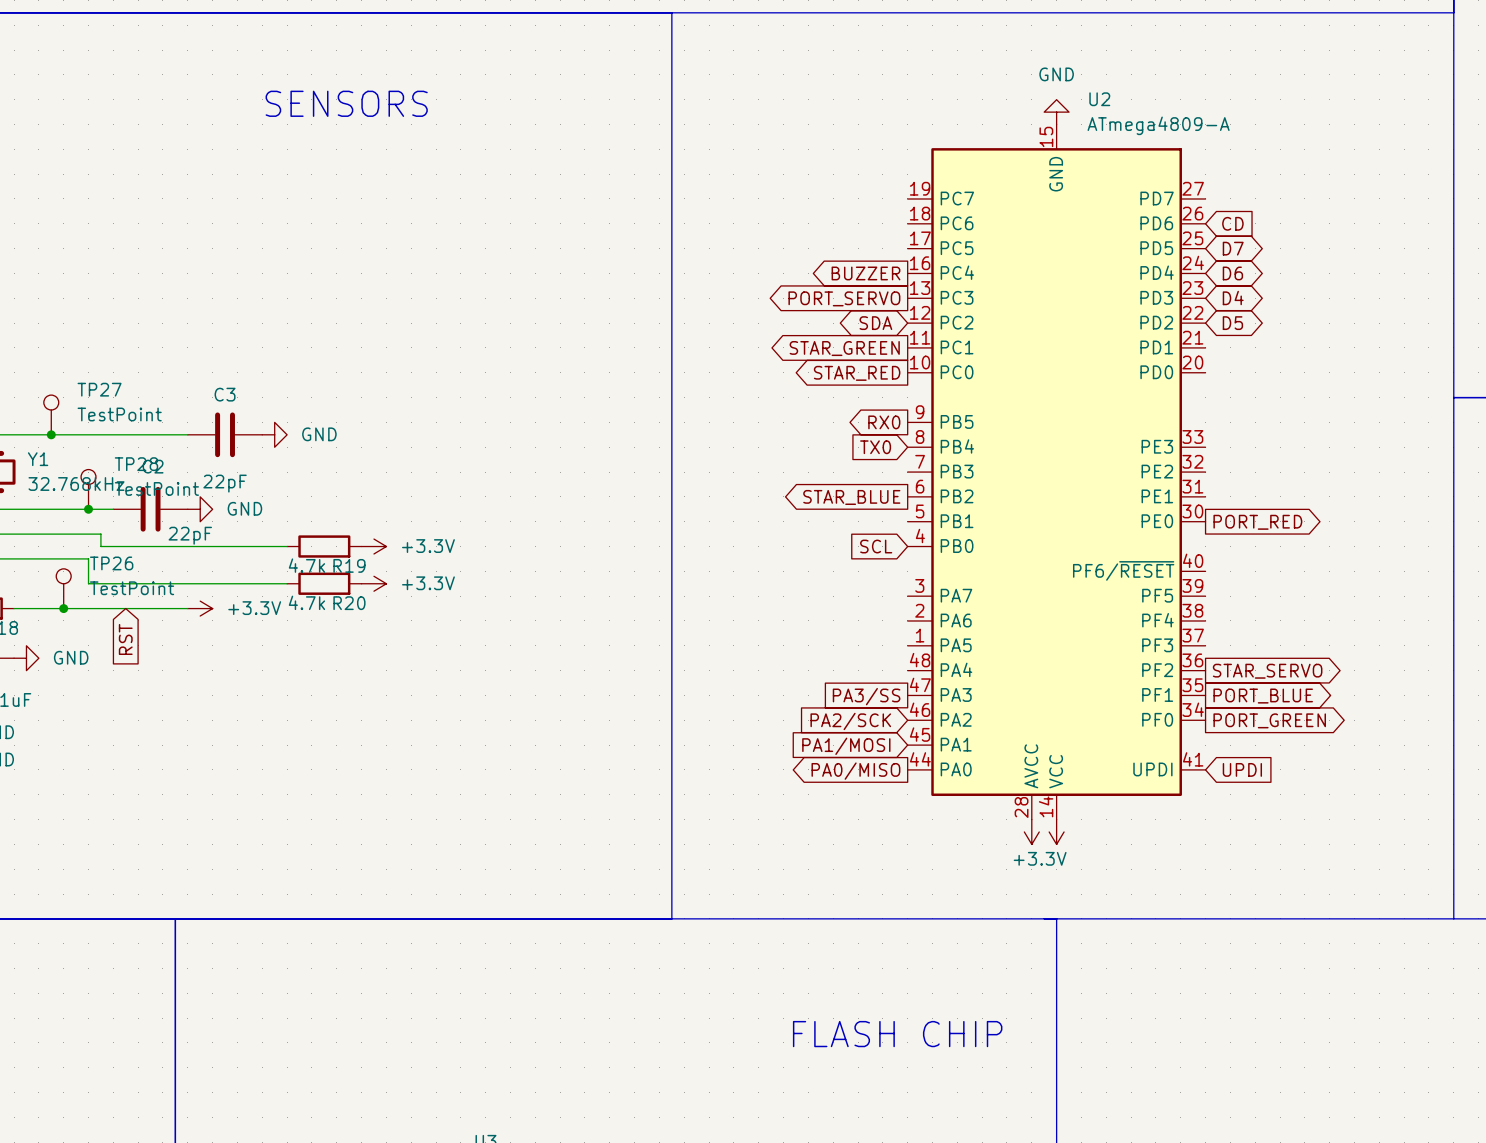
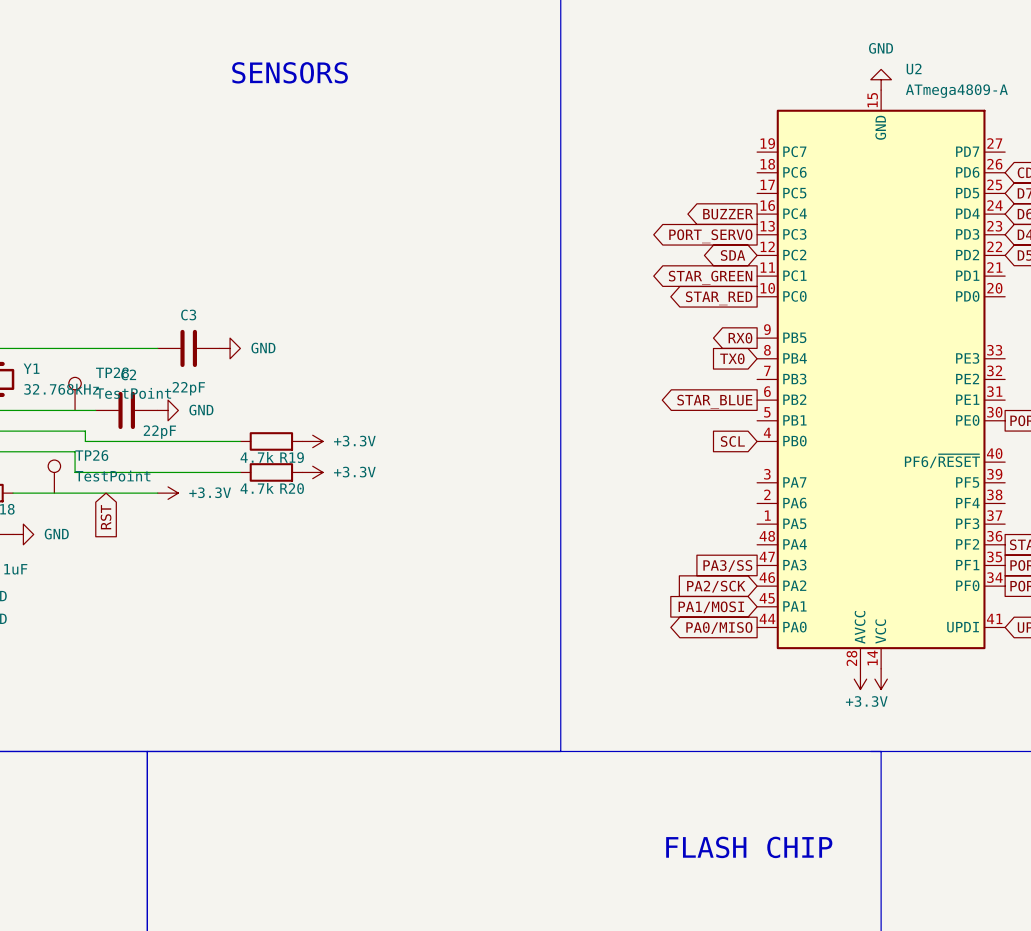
TP27: TestPoint (51, 414) -> none
junction: (51, 434) -> none
junction: (88, 509) -> none
junction: (63, 608) -> none

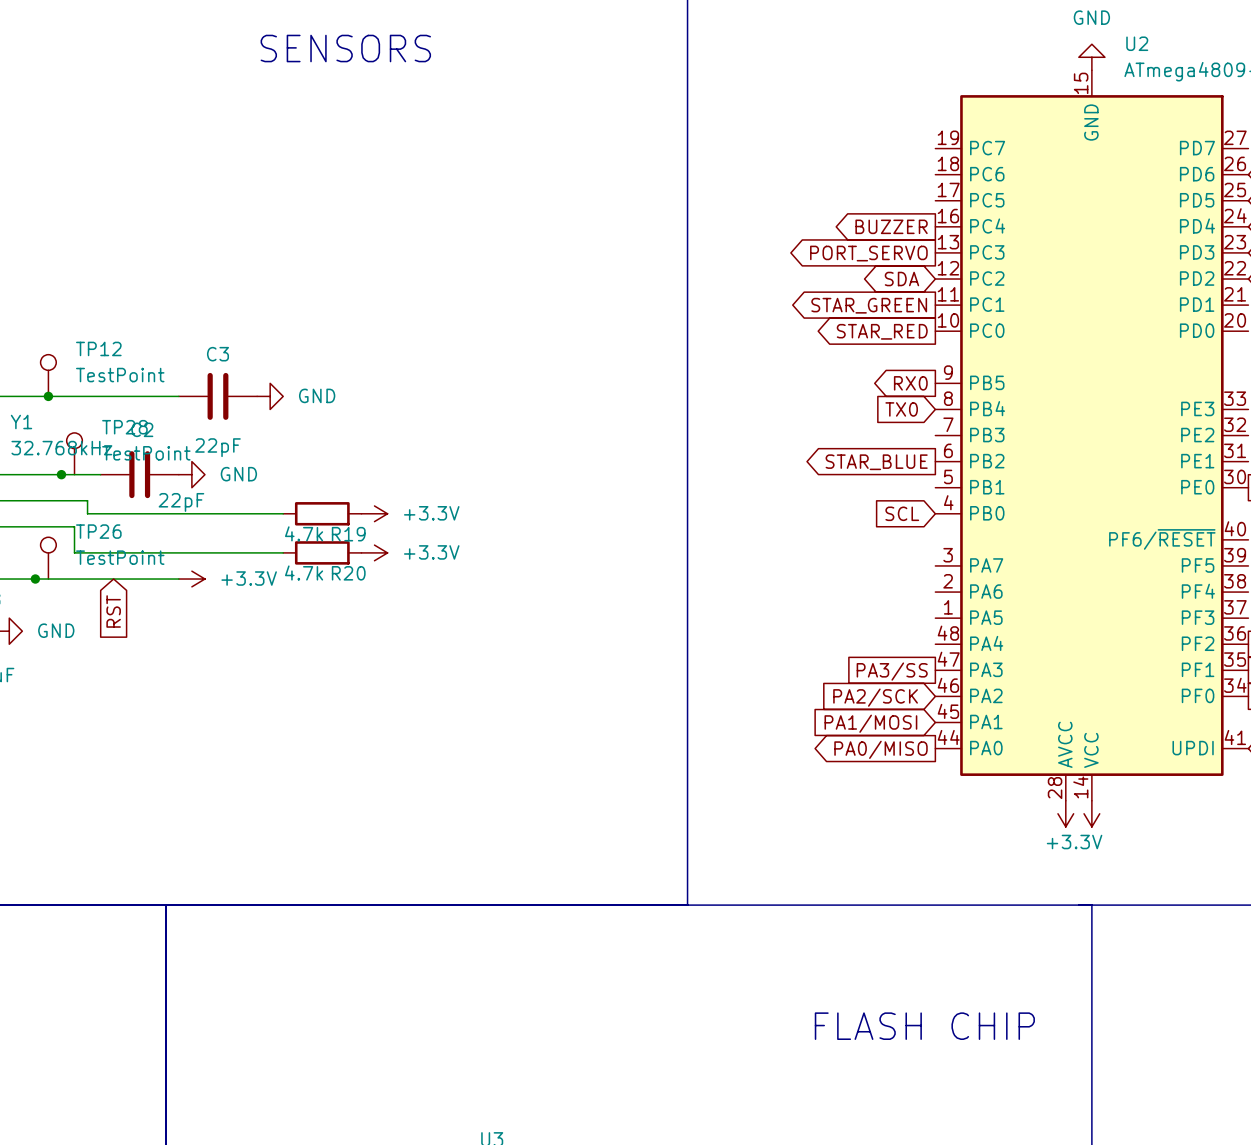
TP12: none -> TestPoint (48, 375)
junction: none -> (48, 396)
junction: none -> (61, 474)
junction: none -> (35, 579)

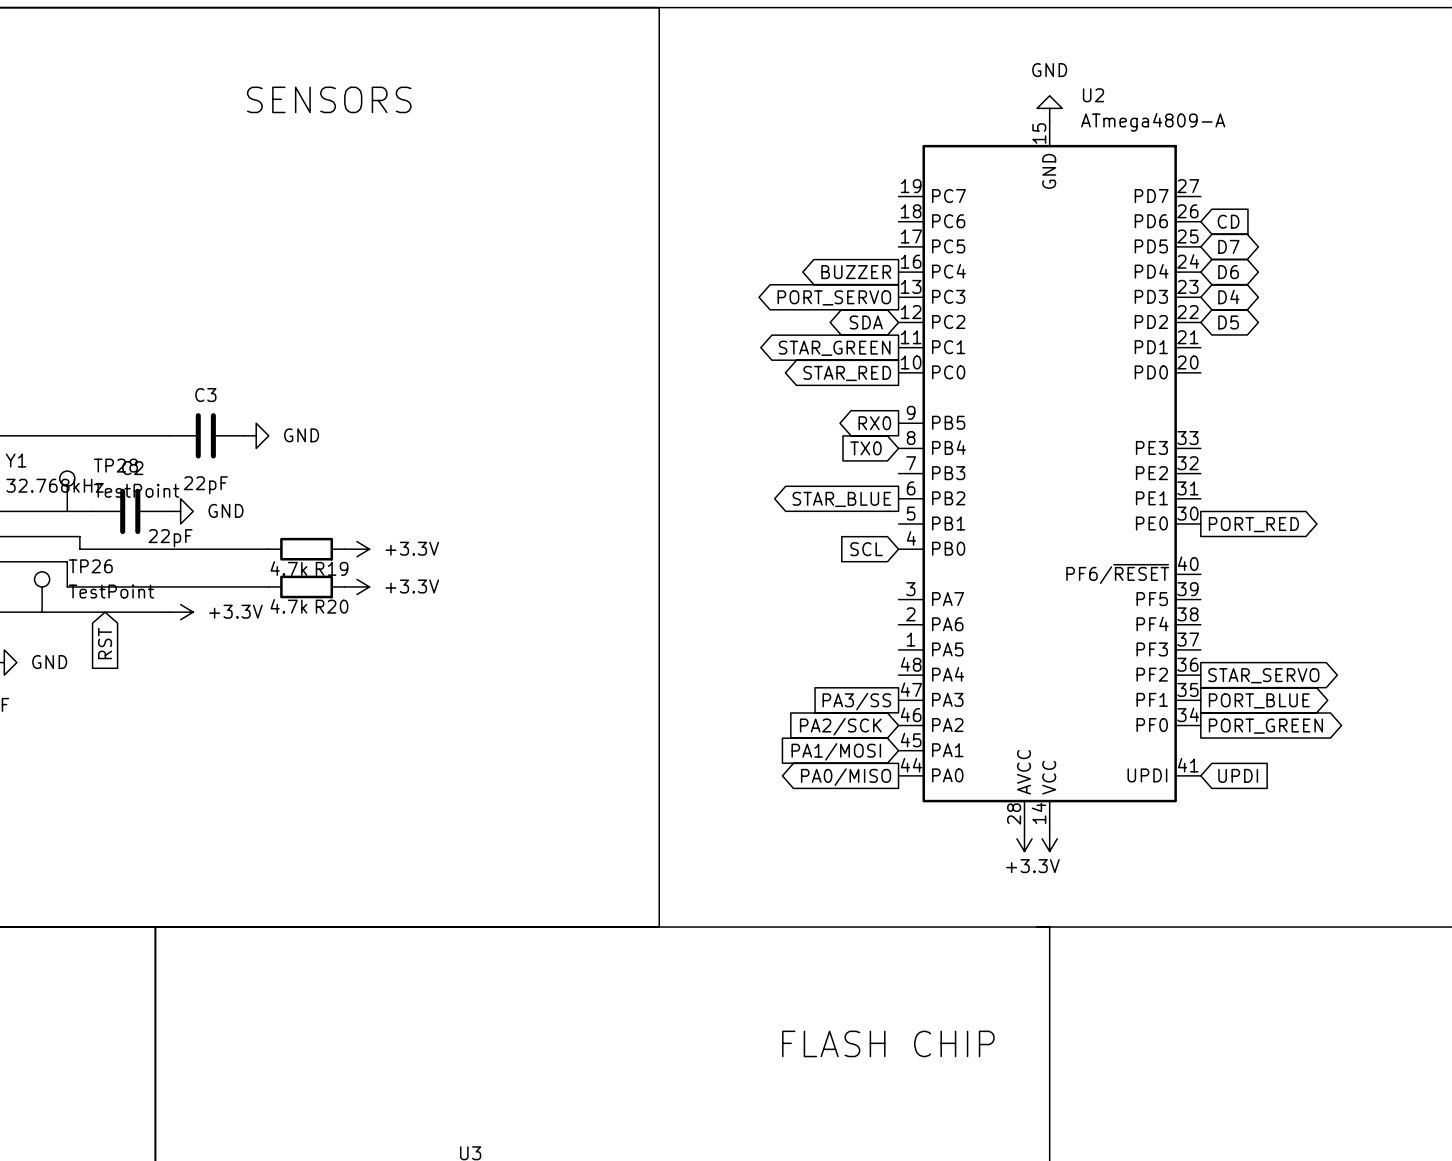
TP12: TestPoint (48, 375) -> none
junction: (48, 396) -> none
junction: (61, 474) -> none
junction: (35, 579) -> none

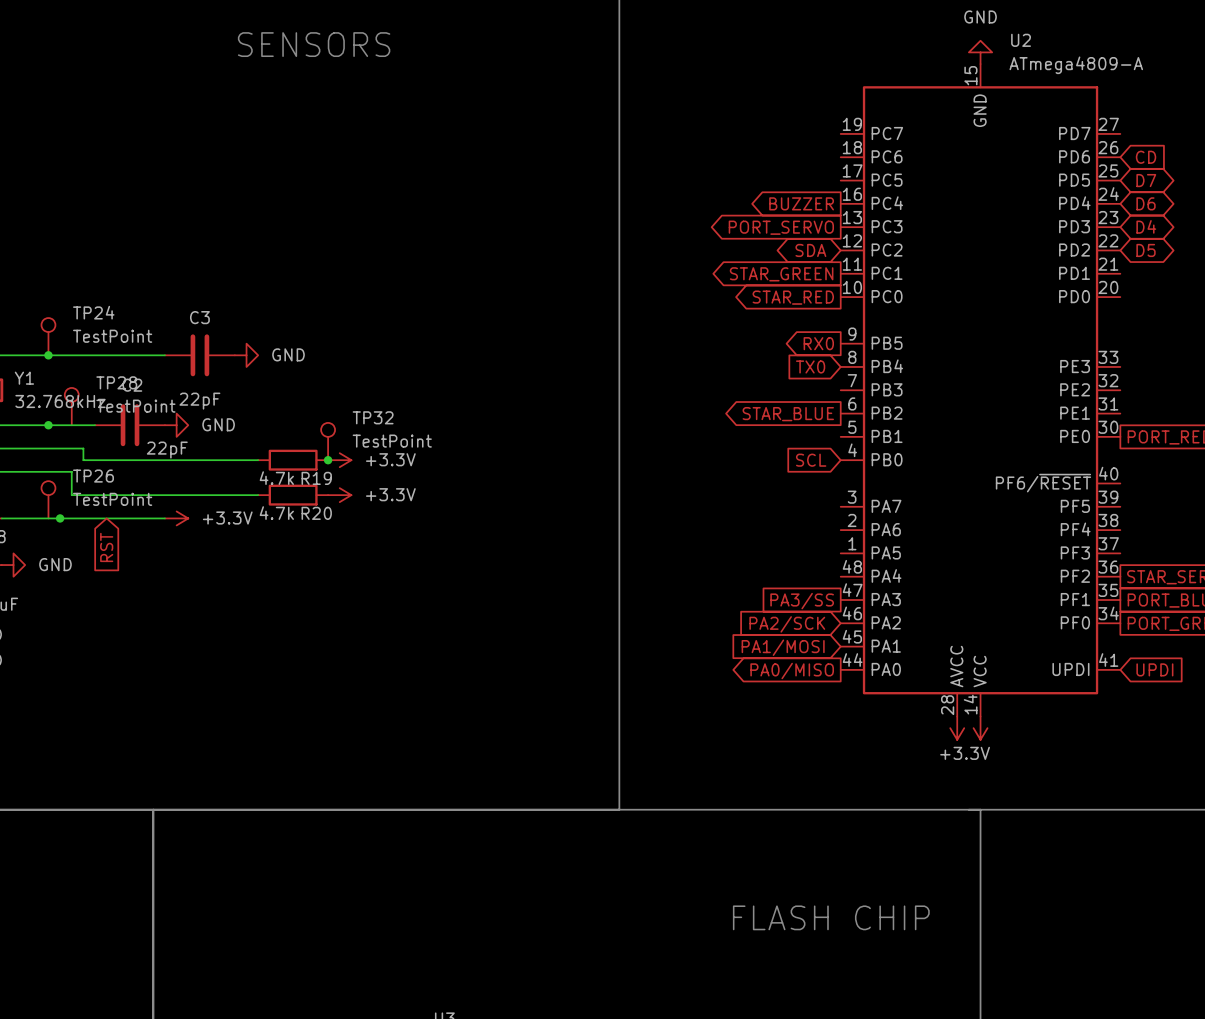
TP24: none -> TestPoint (48, 336)
junction: none -> (48, 355)
junction: none -> (48, 425)
TP32: none -> TestPoint (328, 441)
junction: none -> (328, 460)
junction: none -> (60, 518)

